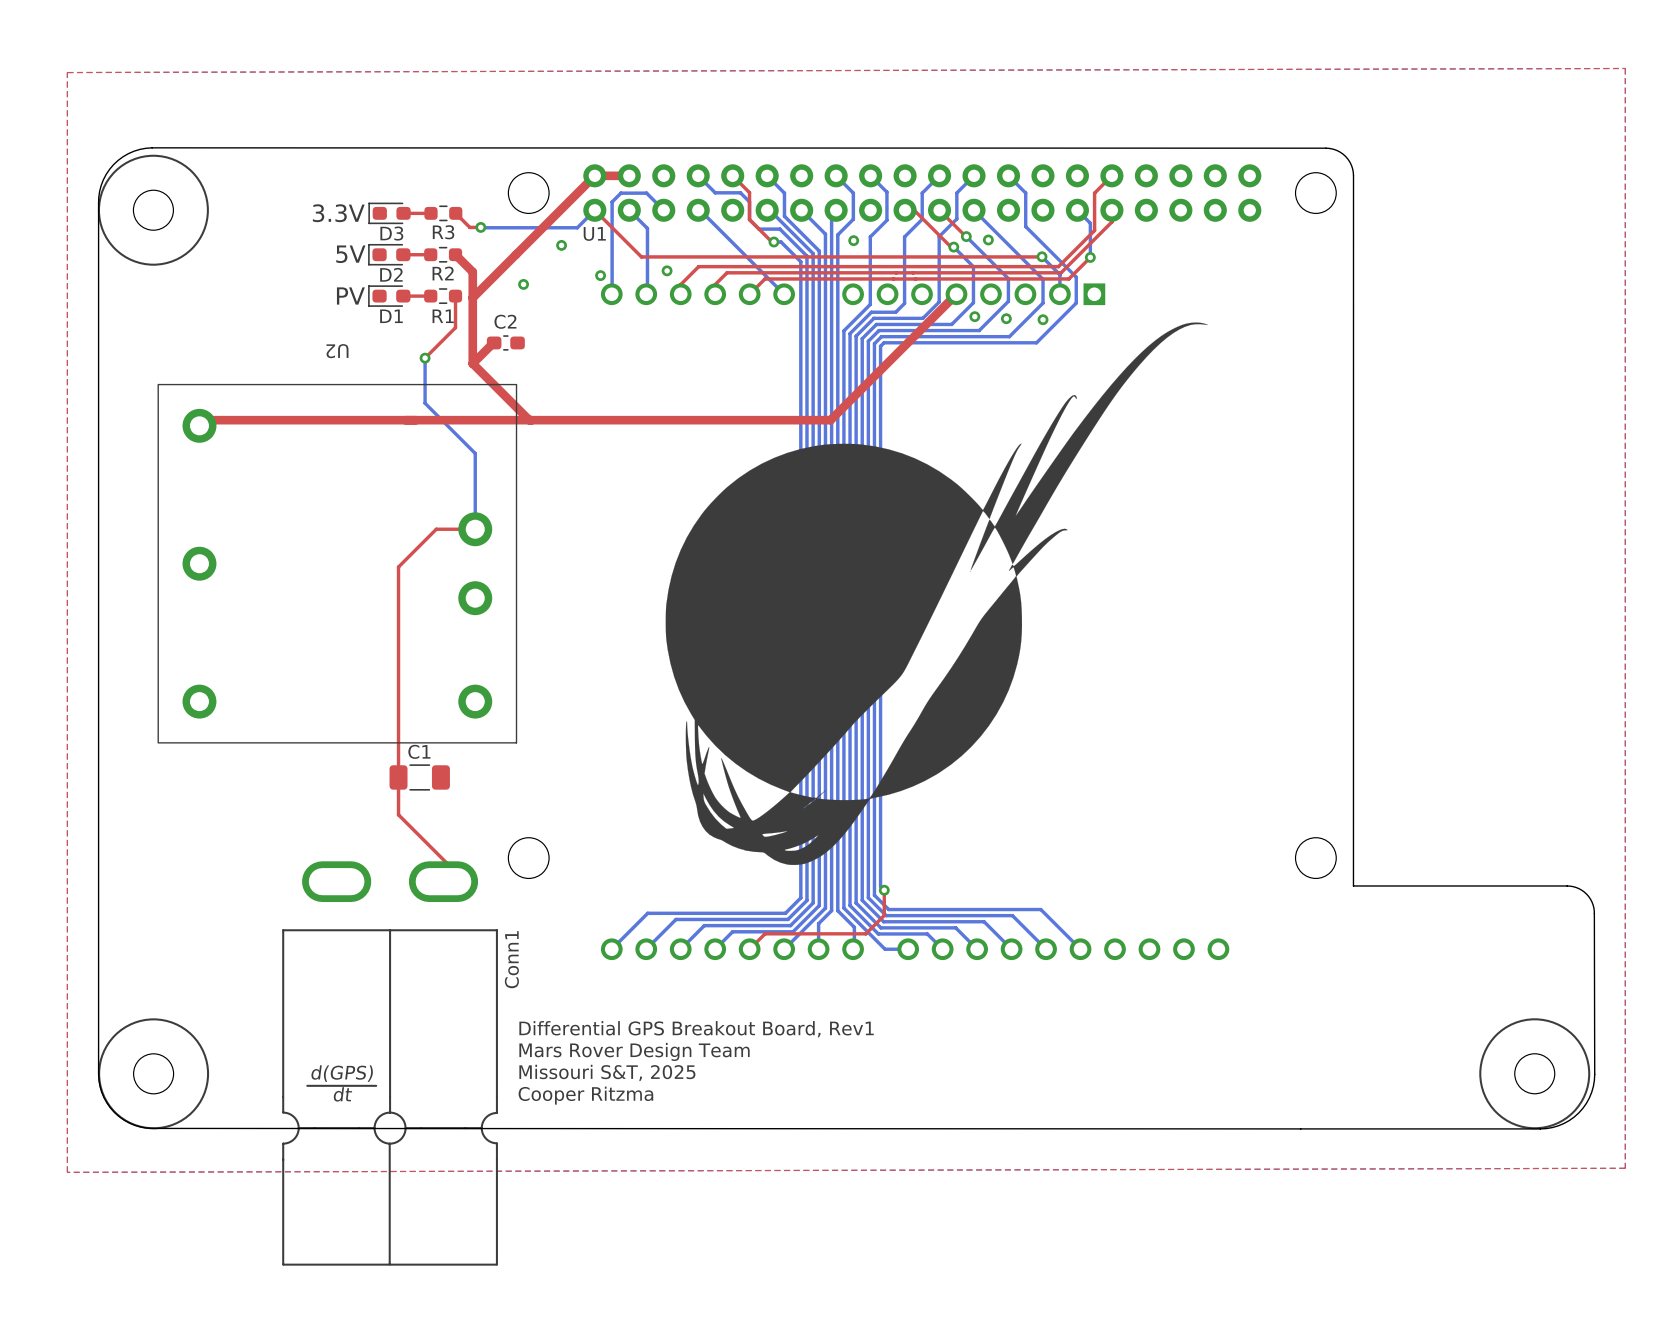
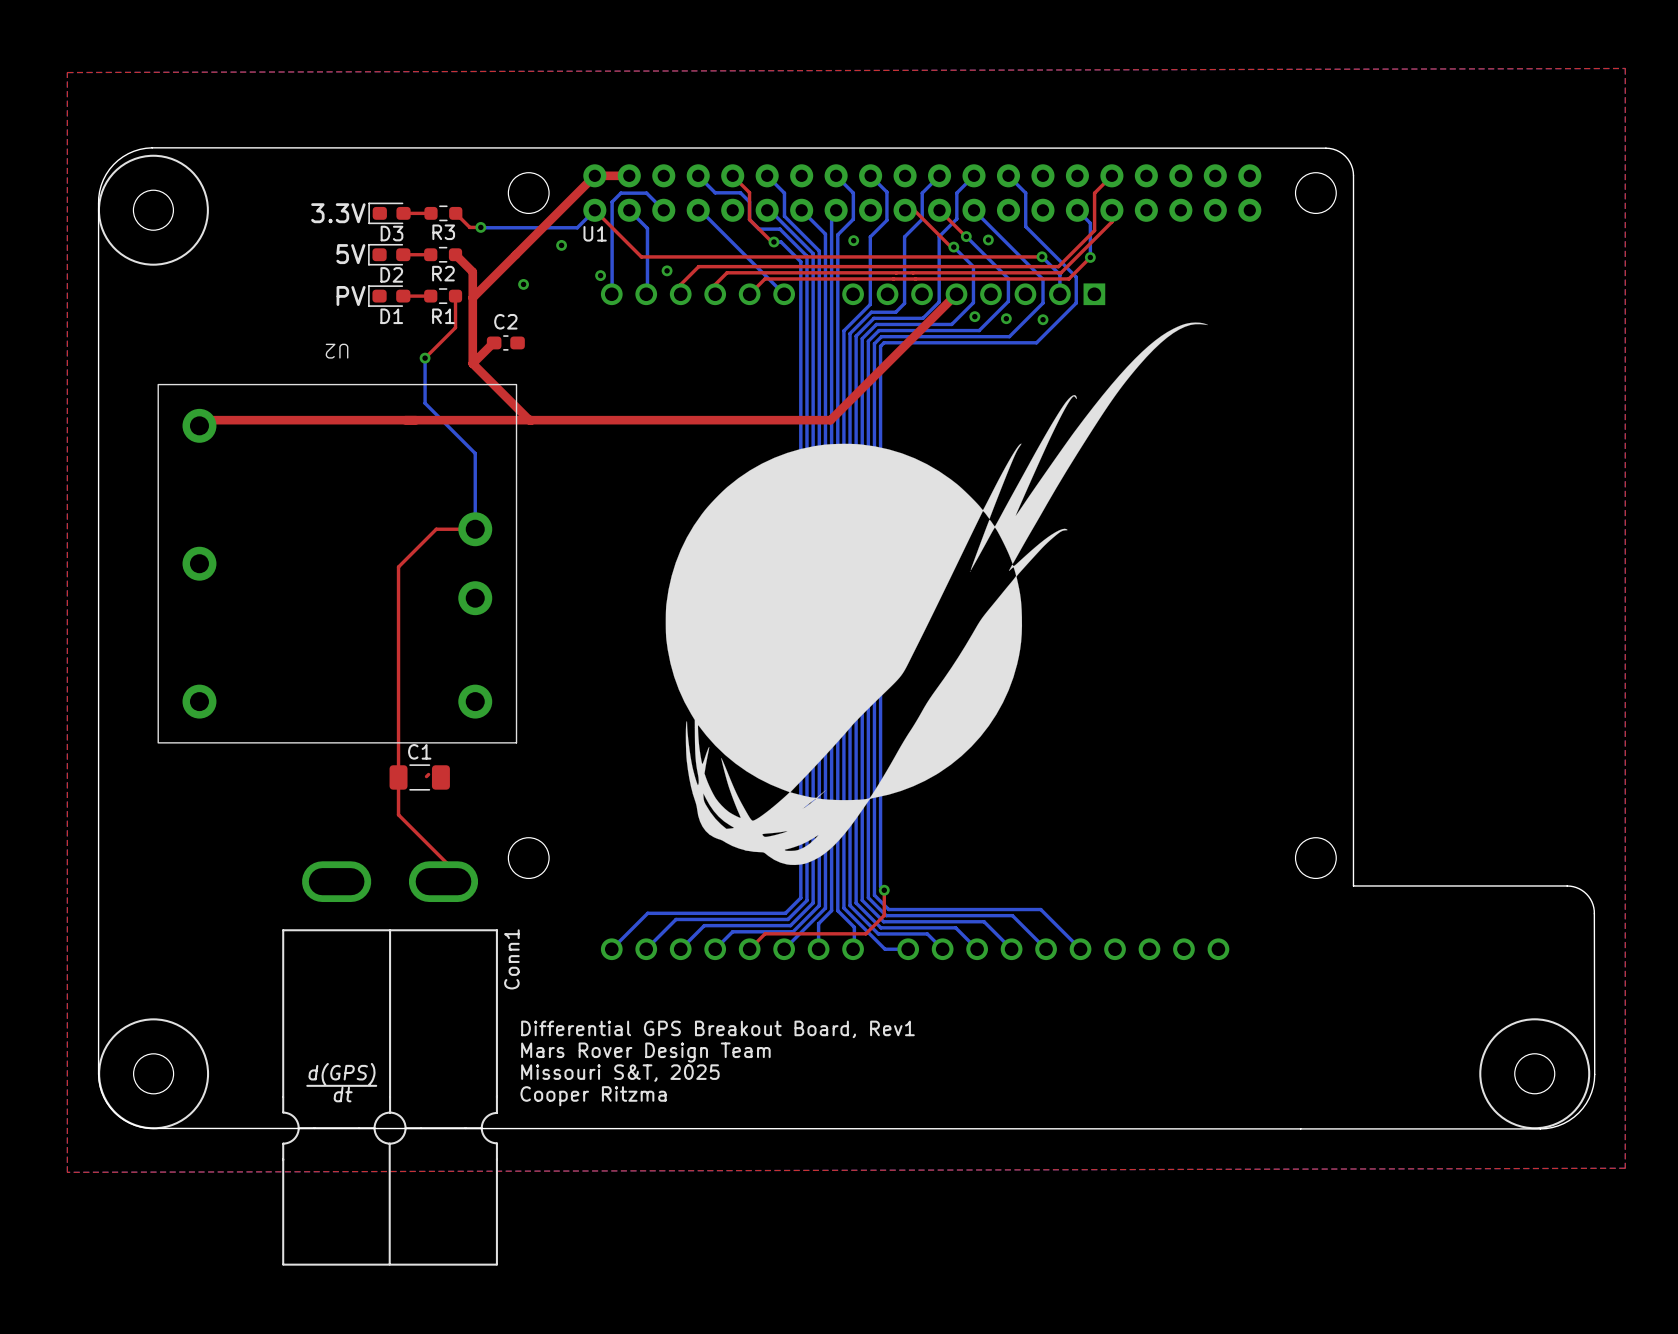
top track: none -> (428, 774) (426, 776)

